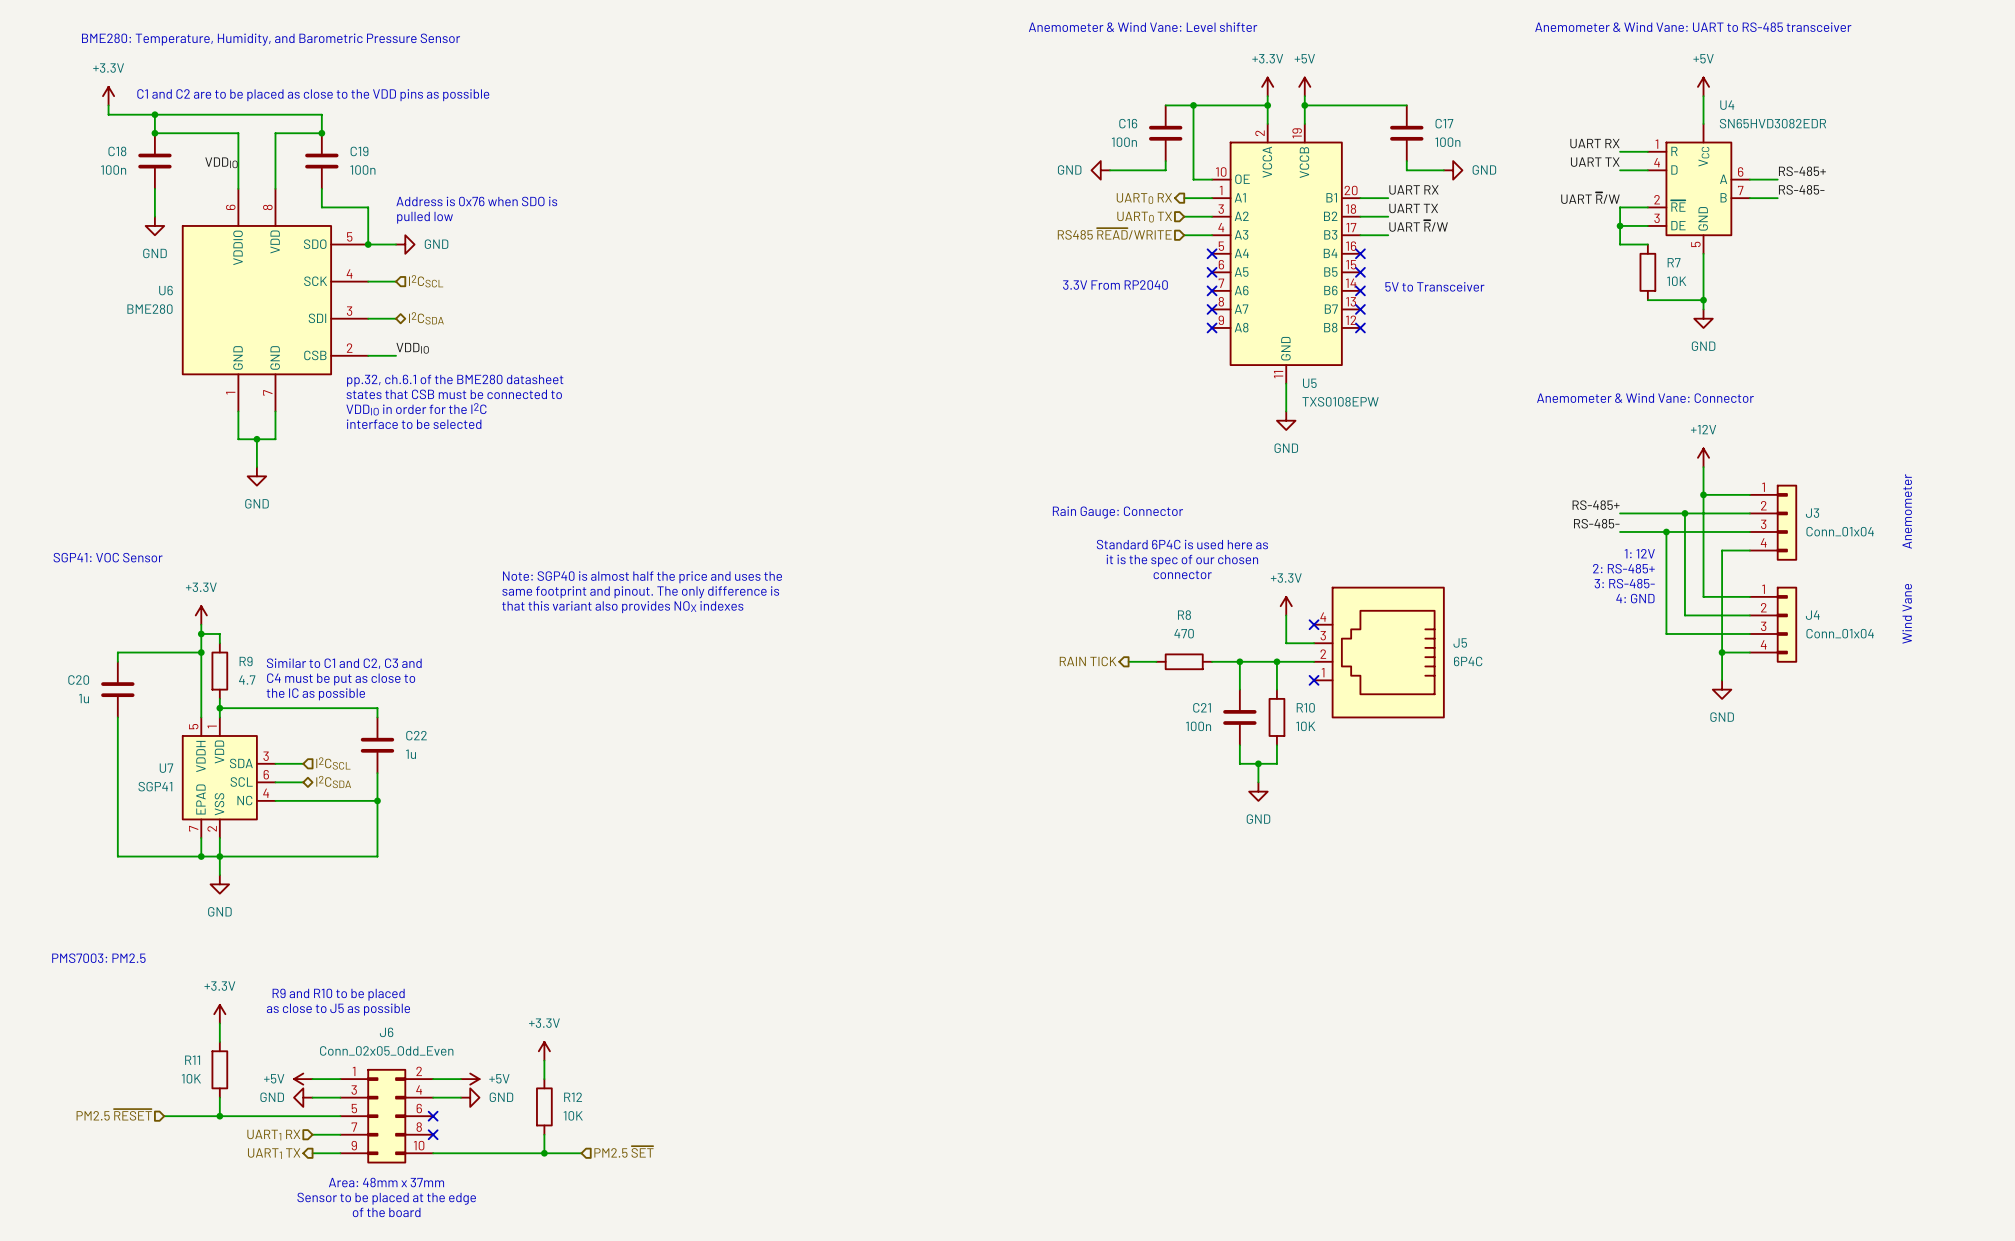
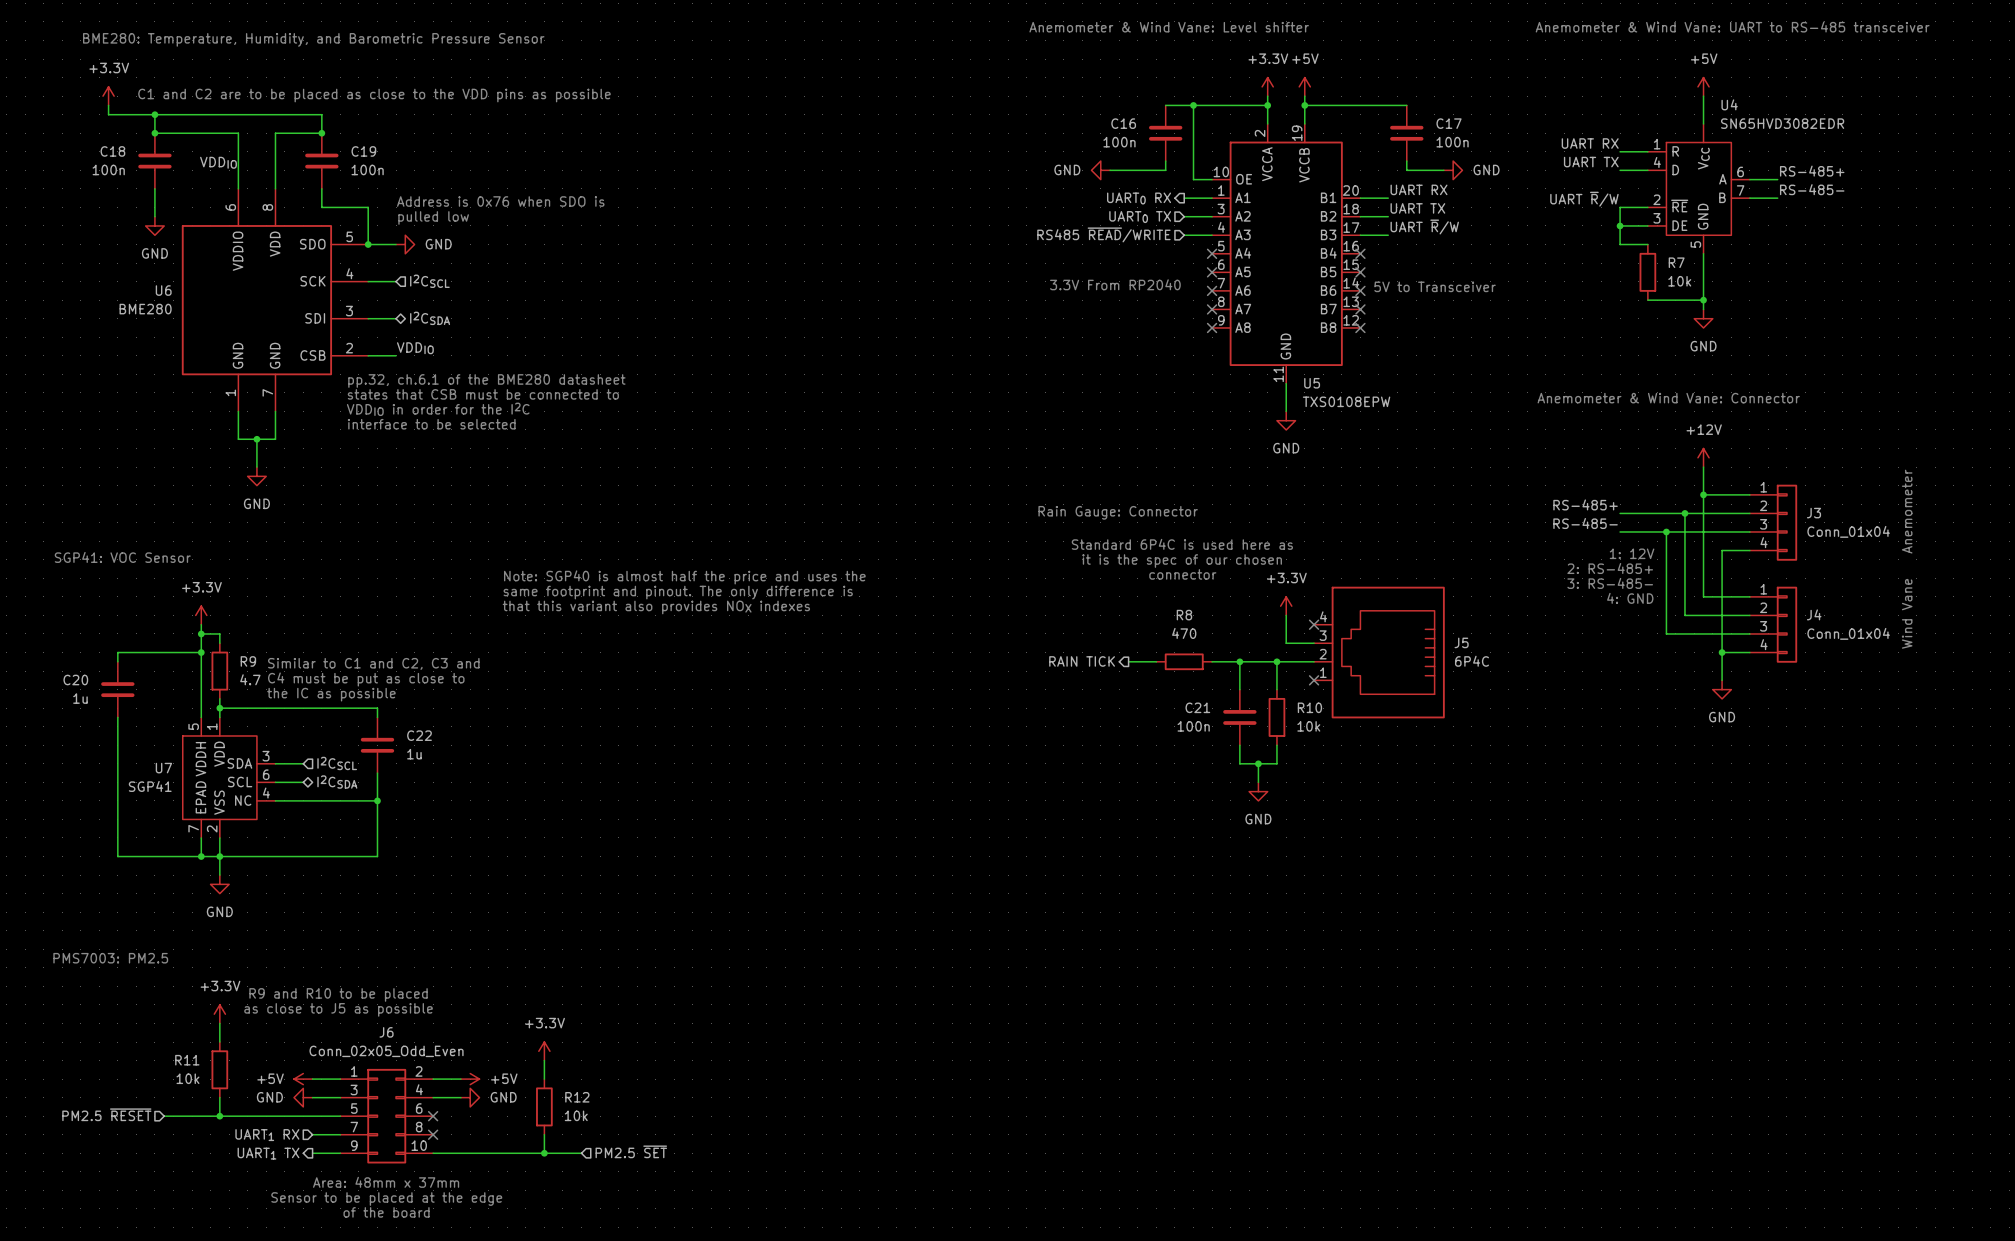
R7 value: 10K (1676, 281) -> 10k (1679, 281)
R10 value: 10K (1305, 726) -> 10k (1308, 726)
R11 value: 10K (191, 1078) -> 10k (187, 1078)
R12 value: 10K (573, 1115) -> 10k (576, 1115)

